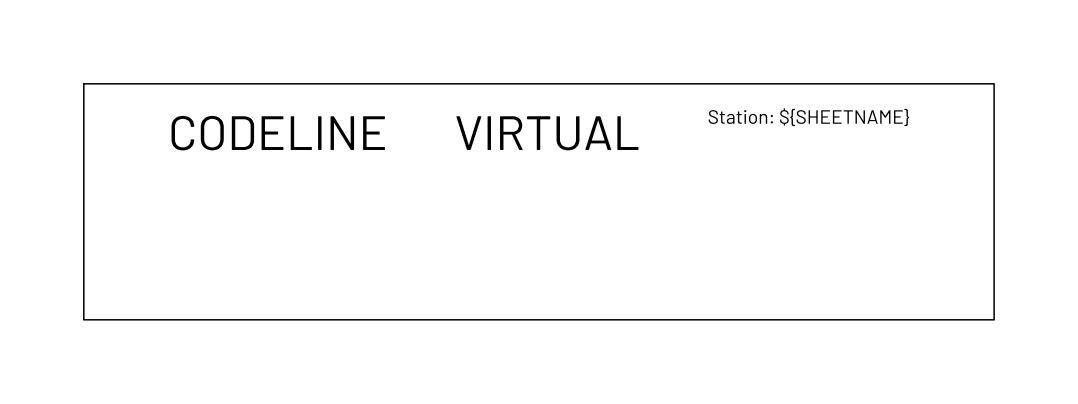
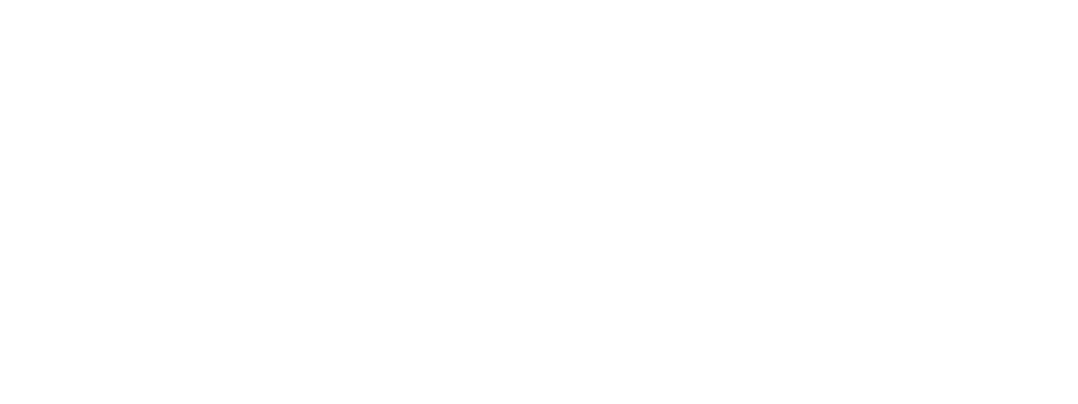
part: VIRTUAL (538, 201) -> none

